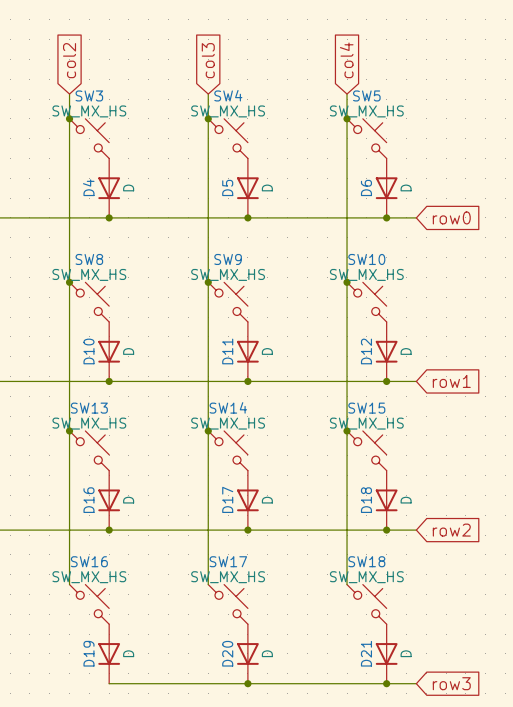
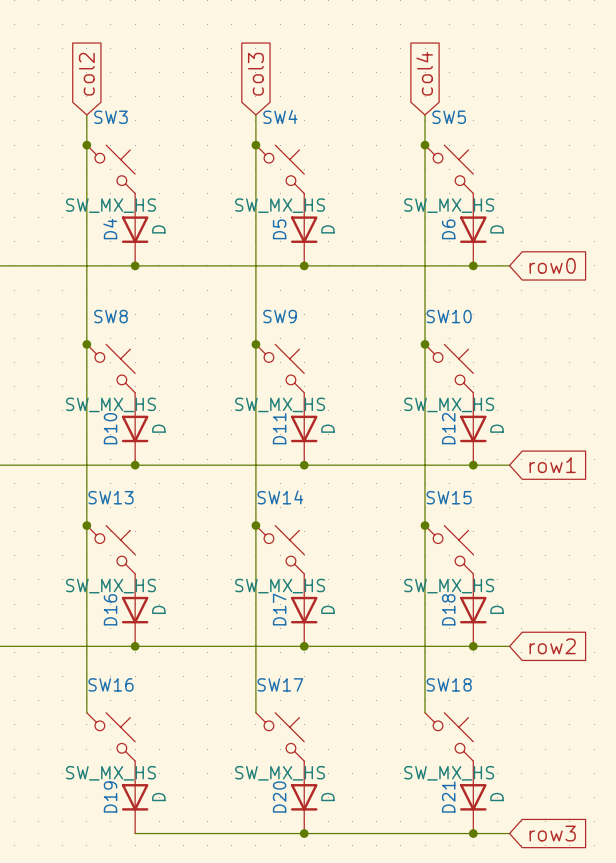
SW3 value position: SW_MX_HS (89, 111) -> SW_MX_HS (110, 205)
SW4 value position: SW_MX_HS (228, 111) -> SW_MX_HS (280, 205)
SW5 value position: SW_MX_HS (366, 111) -> SW_MX_HS (449, 205)
SW8 value position: SW_MX_HS (89, 274) -> SW_MX_HS (110, 404)
SW9 value position: SW_MX_HS (228, 274) -> SW_MX_HS (280, 404)
SW10 value position: SW_MX_HS (366, 274) -> SW_MX_HS (449, 404)
SW13 value position: SW_MX_HS (89, 423) -> SW_MX_HS (110, 586)
SW14 value position: SW_MX_HS (228, 423) -> SW_MX_HS (280, 586)
SW15 value position: SW_MX_HS (366, 423) -> SW_MX_HS (449, 586)
SW16 value position: SW_MX_HS (89, 577) -> SW_MX_HS (110, 773)
SW17 value position: SW_MX_HS (228, 577) -> SW_MX_HS (280, 773)
SW18 value position: SW_MX_HS (366, 577) -> SW_MX_HS (449, 773)

